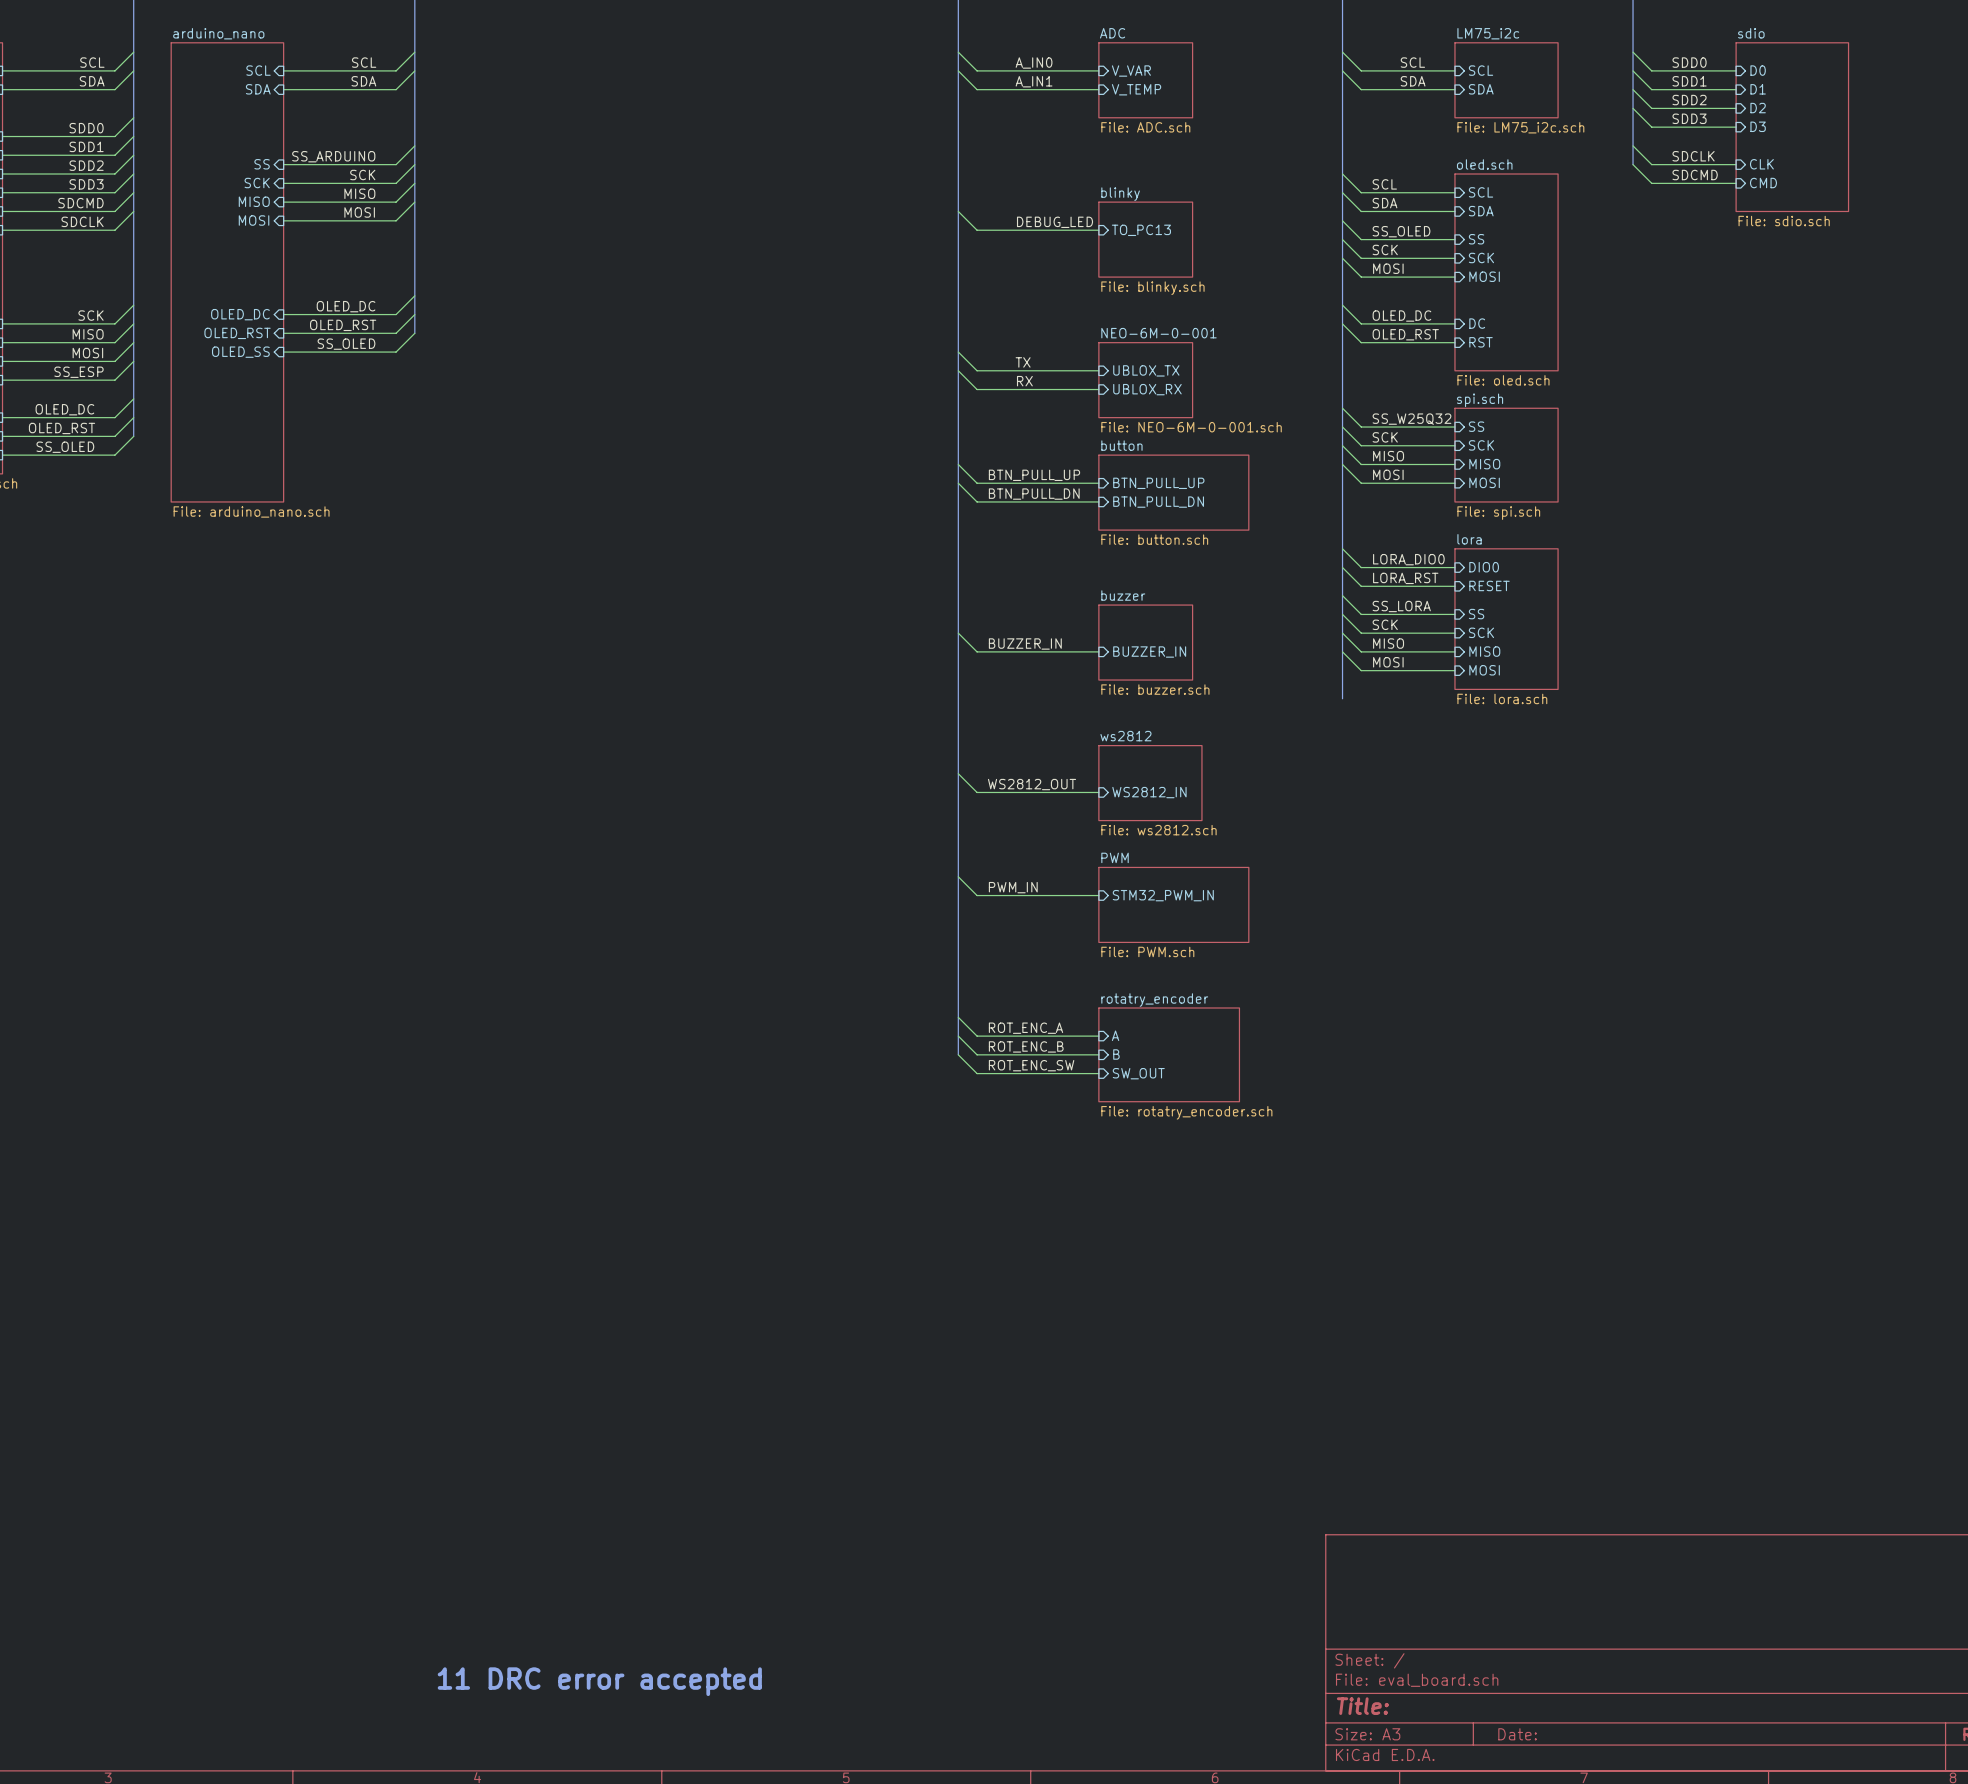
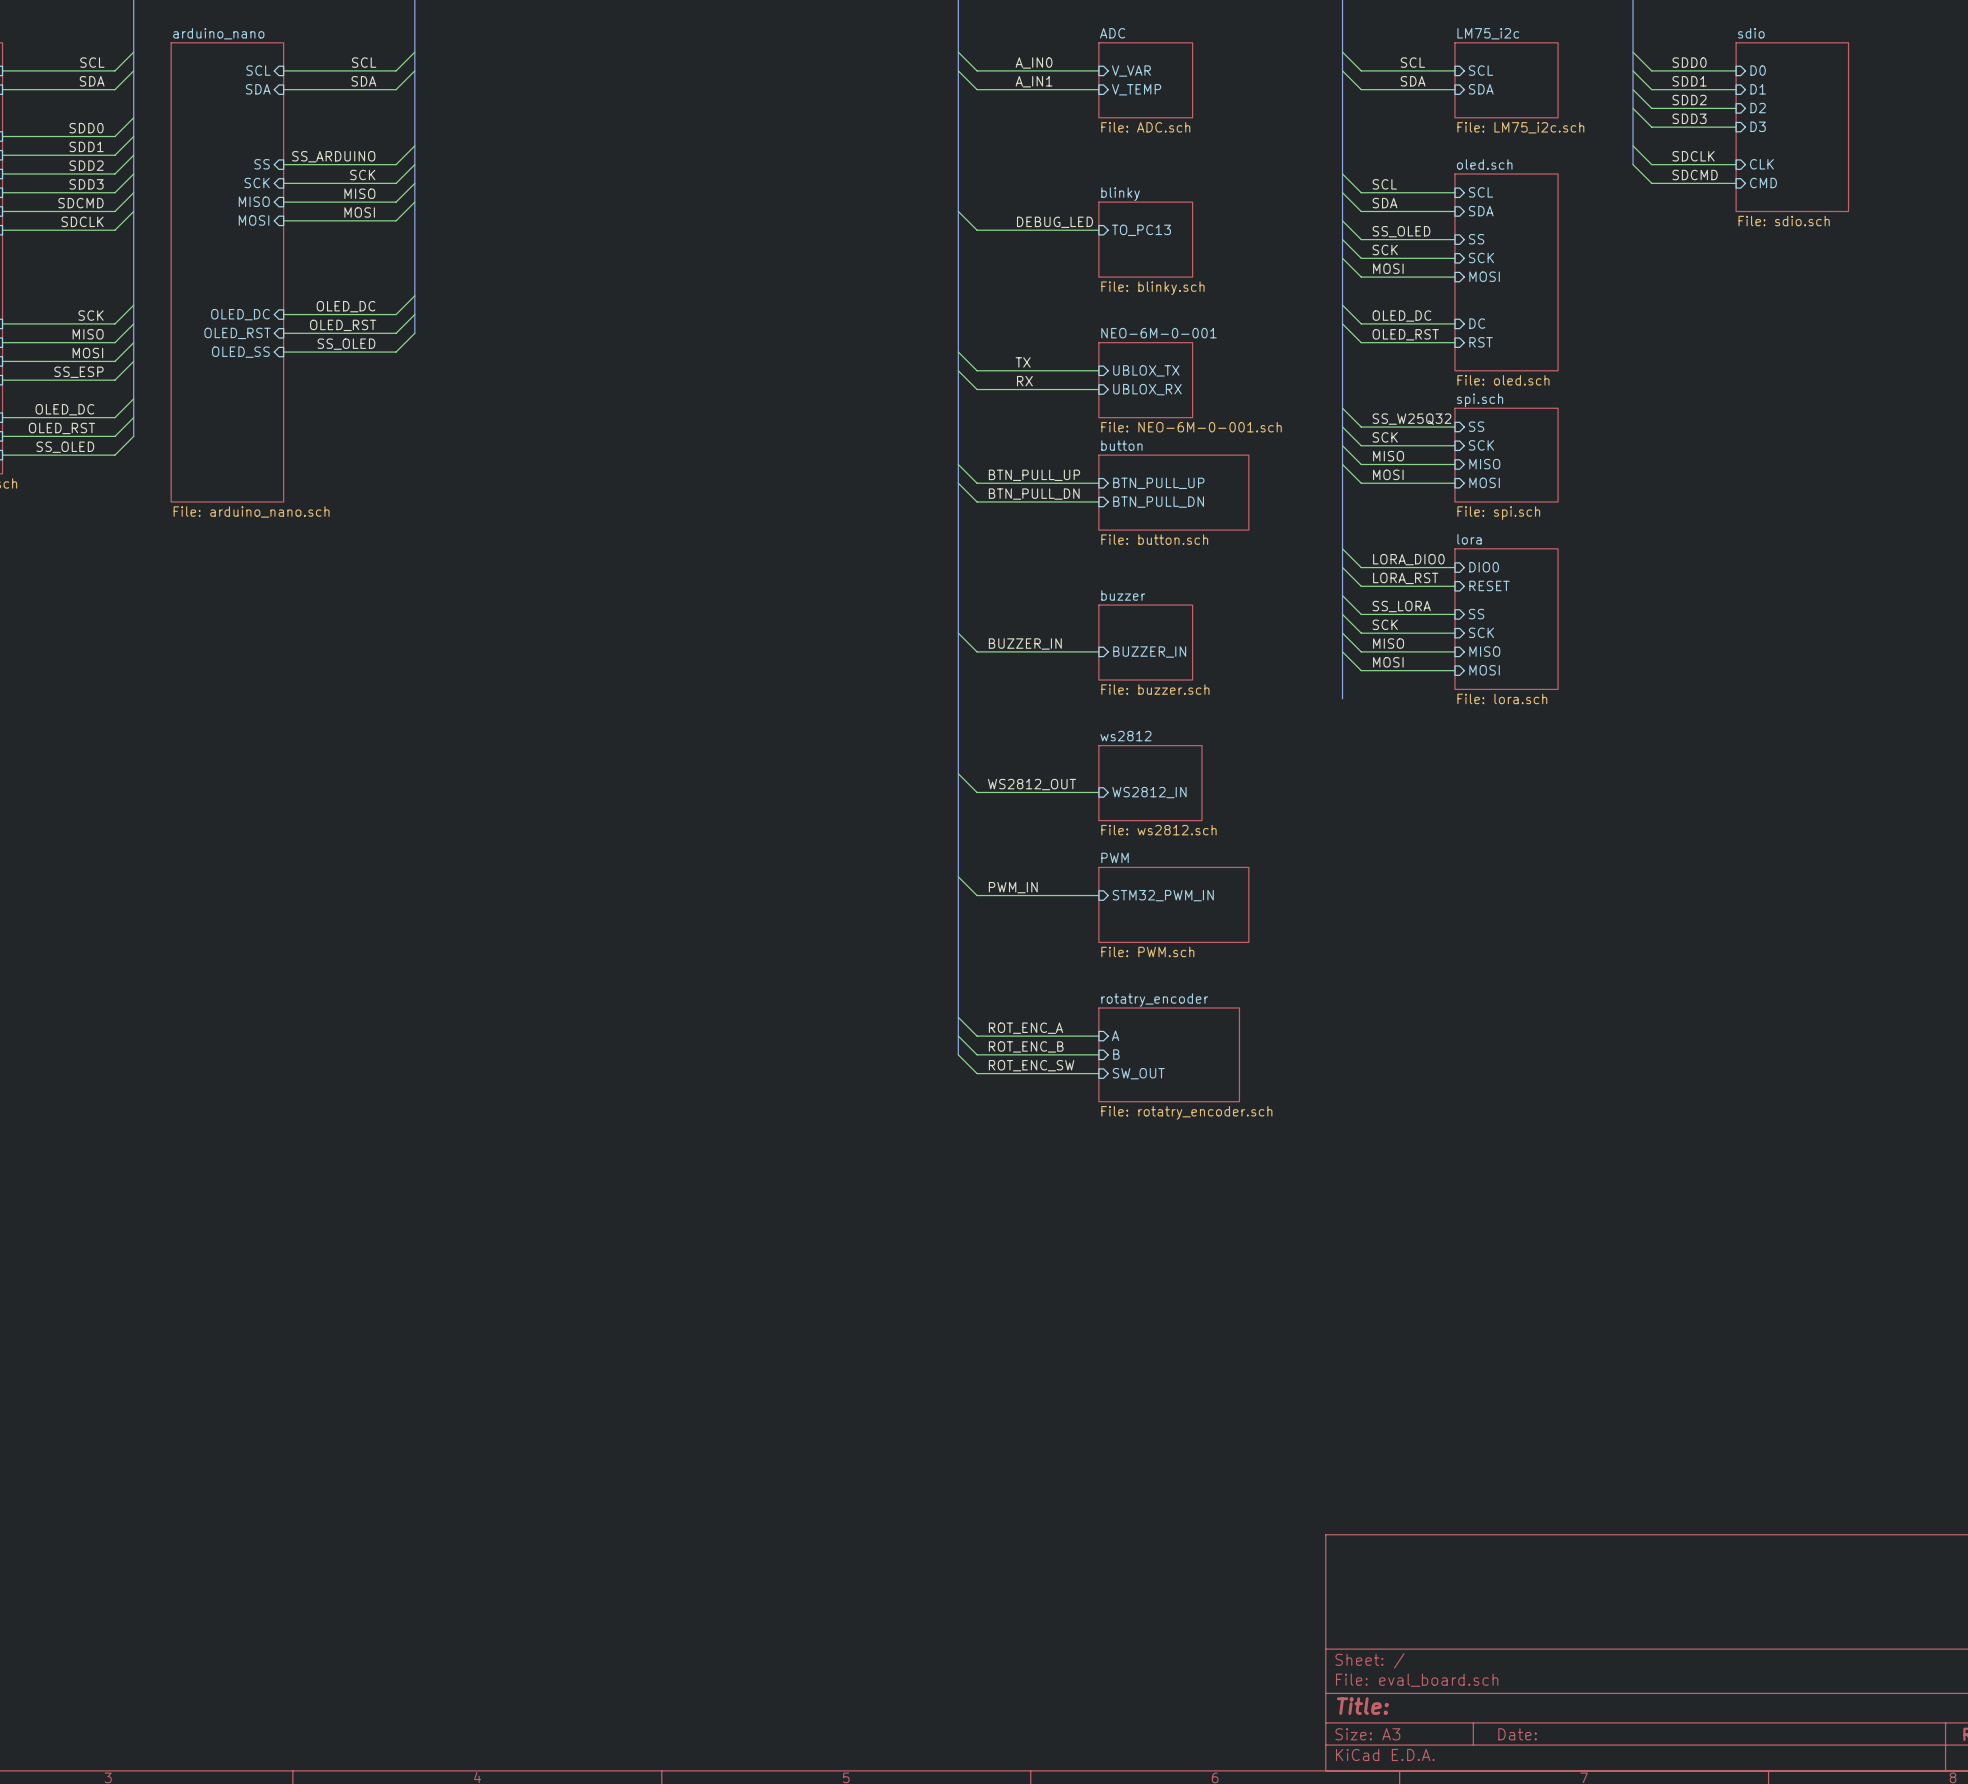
text: 11 DRC error accepted (599, 1681) -> none

